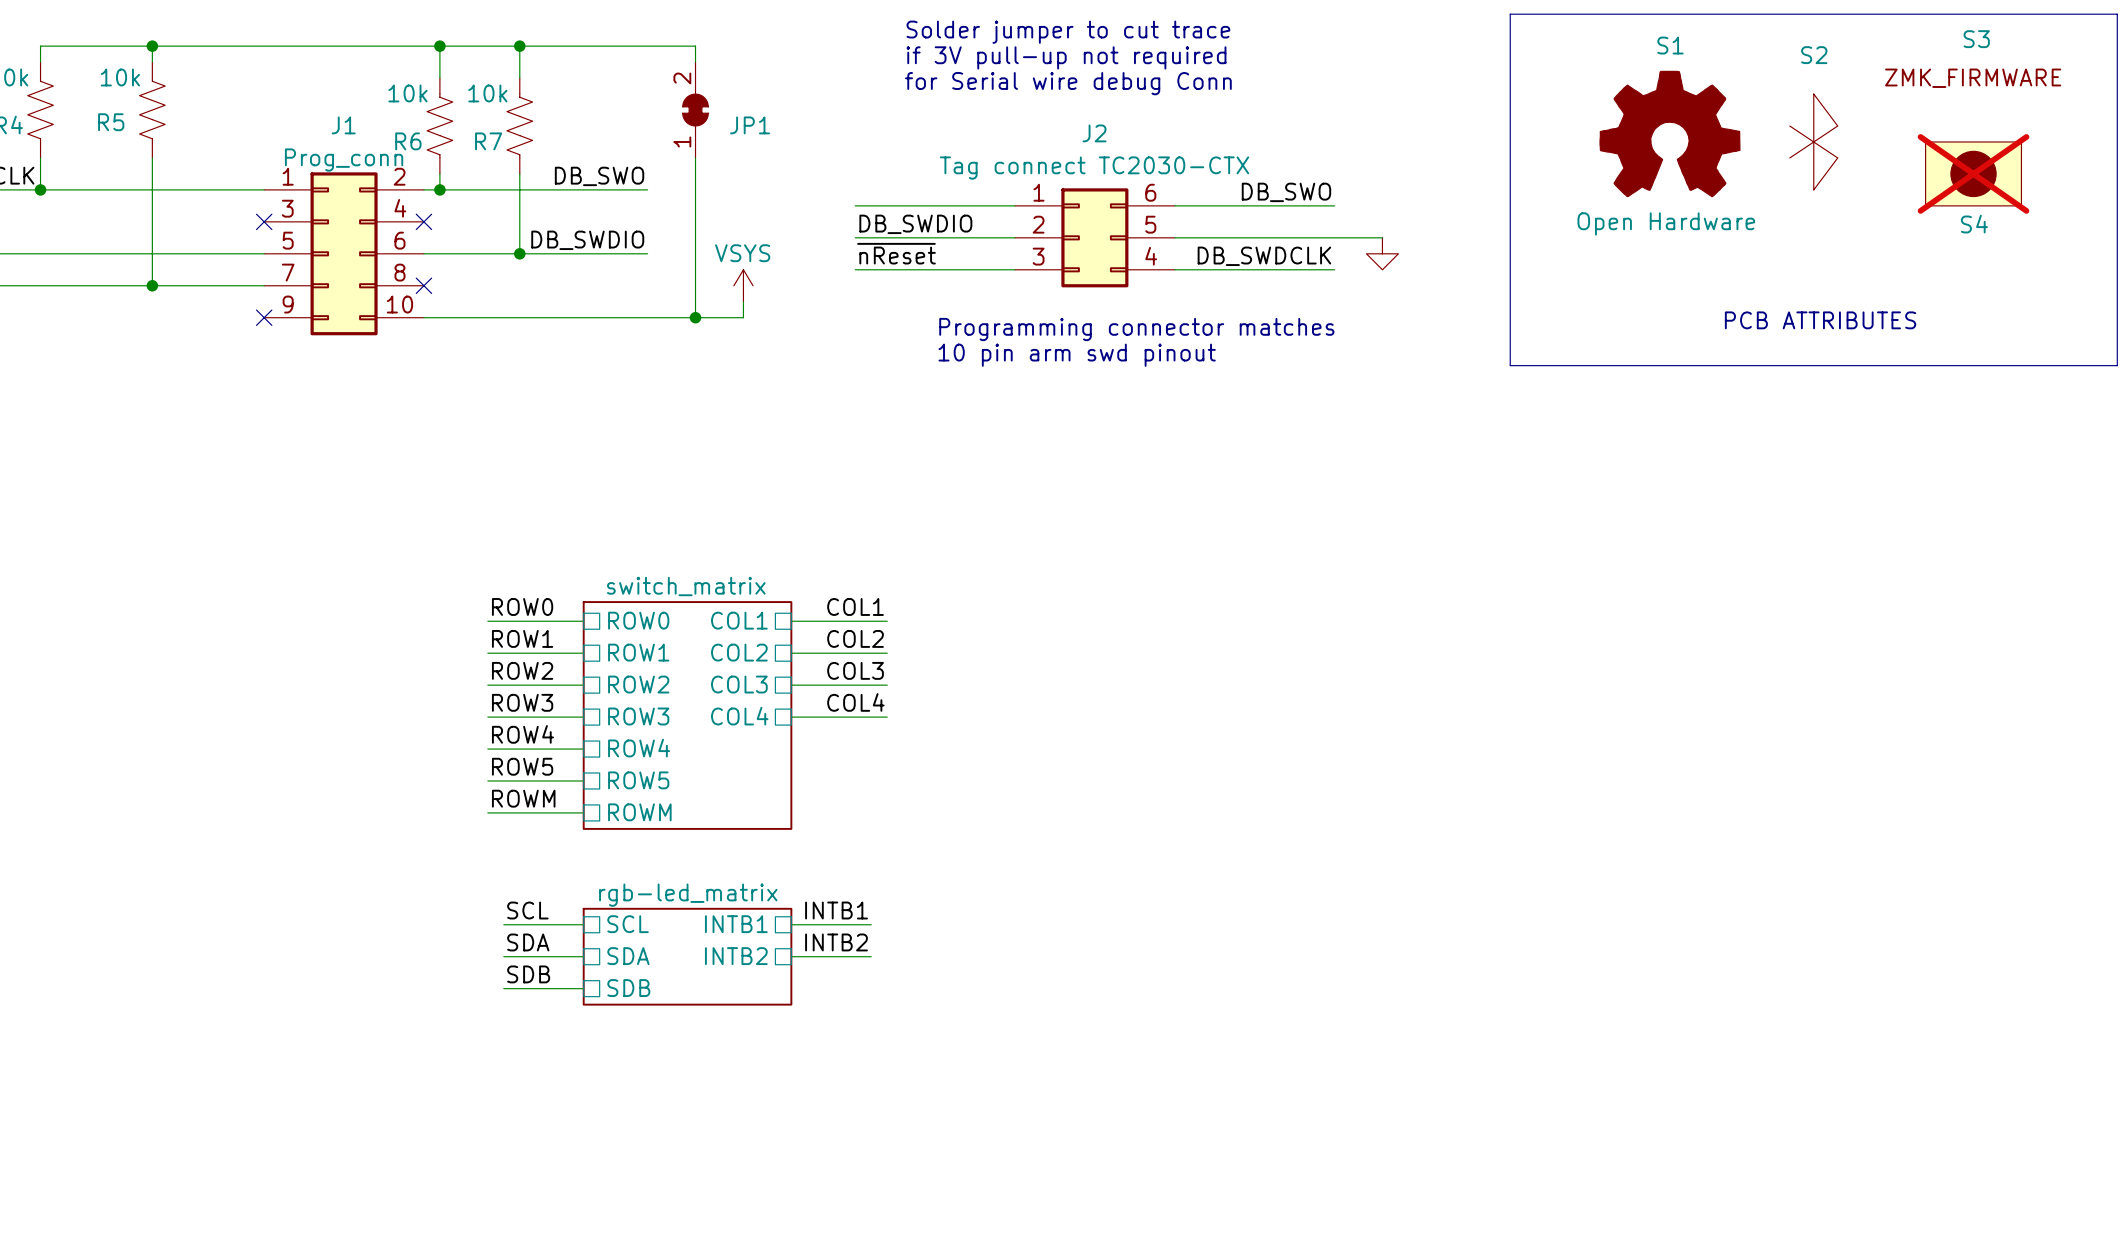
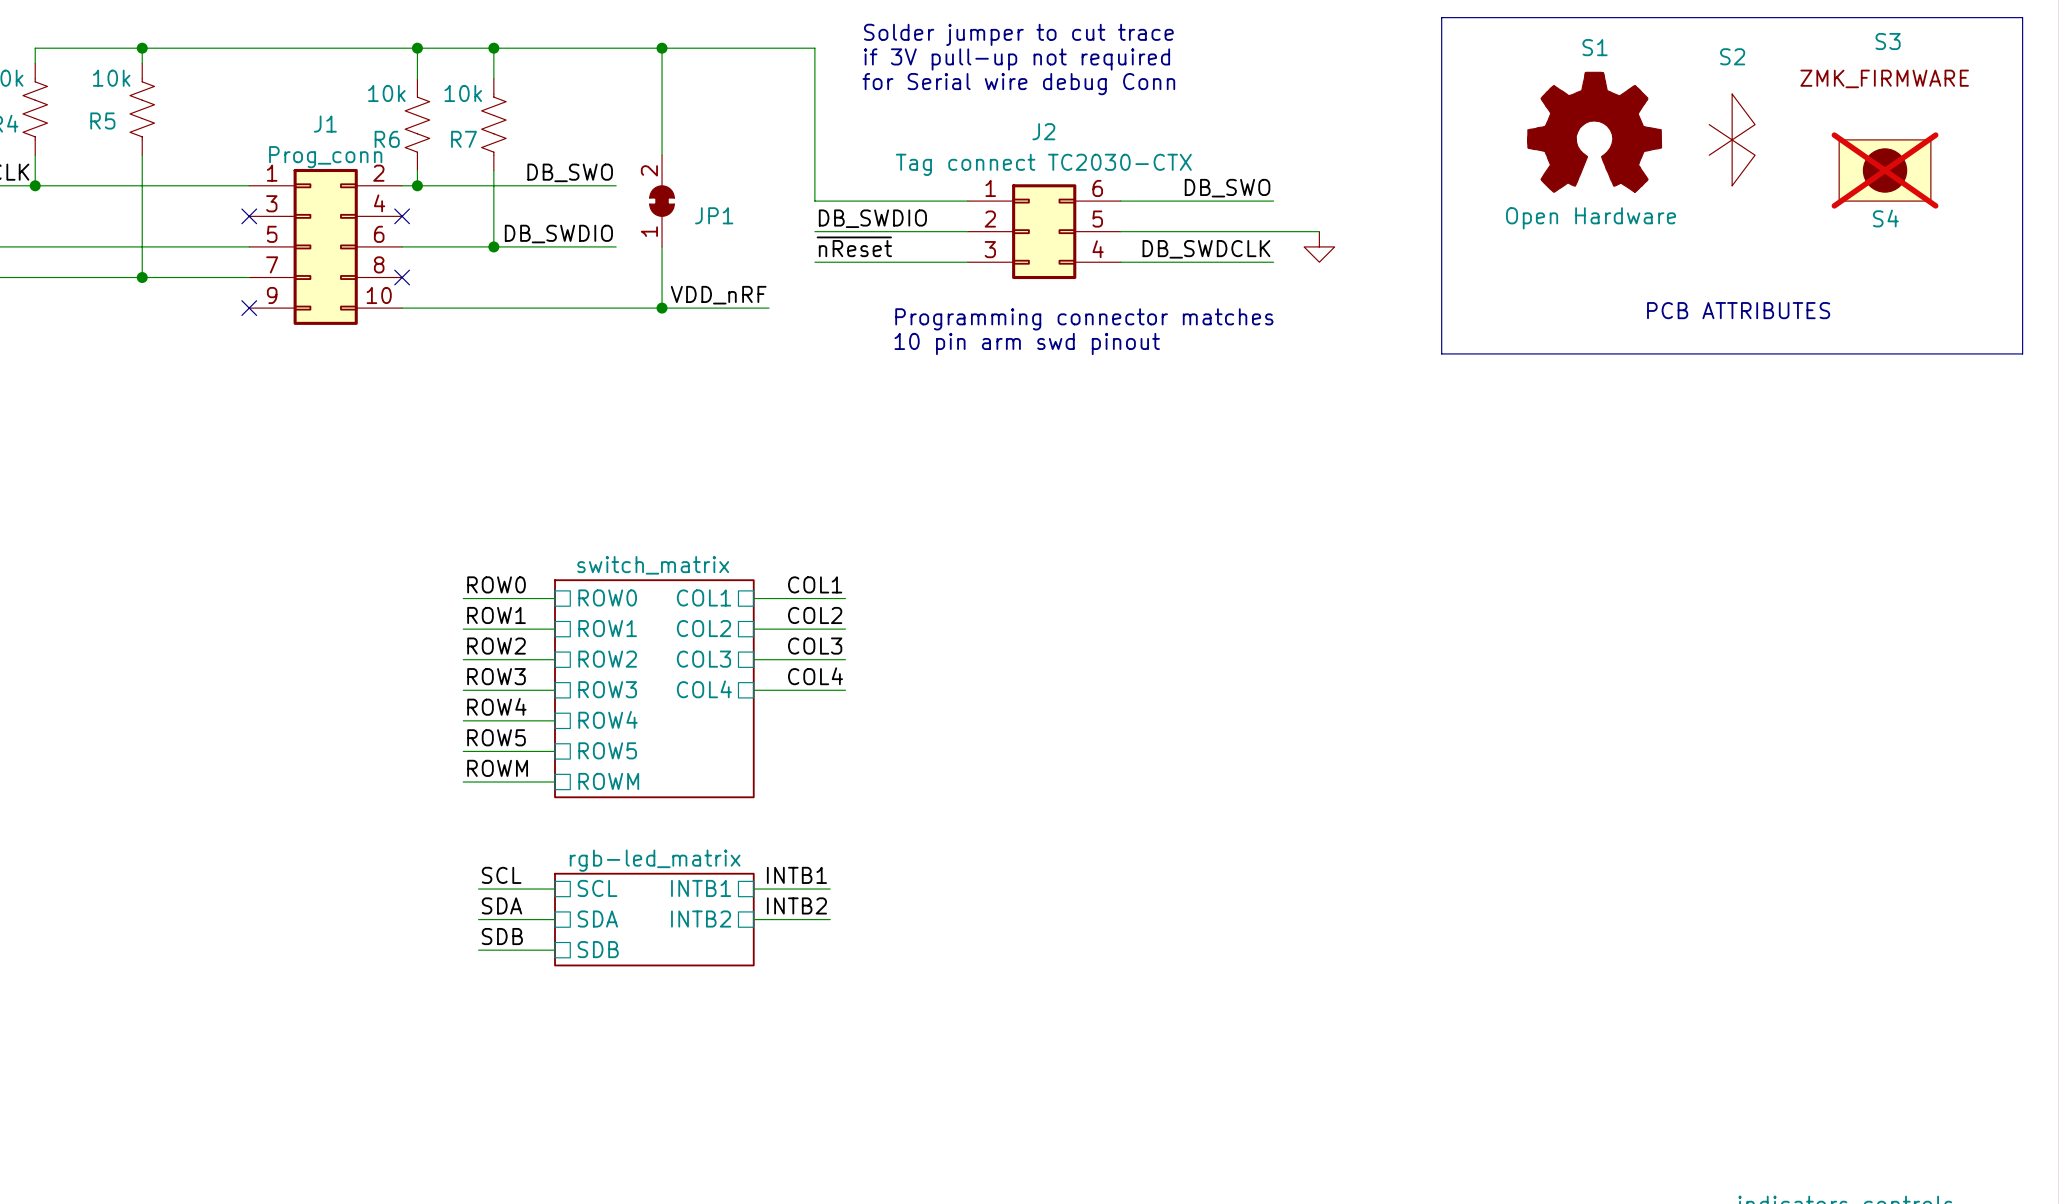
wire: none -> (662, 48) (814, 48) (814, 201)
junction: none -> (662, 48)
JP1 position: (695, 110) -> (662, 201)
power symbol: VSYS (743, 285) -> none
wire: (743, 301) (743, 317) -> (769, 308) (707, 308)
label: none -> VDD_nRF (718, 295)

